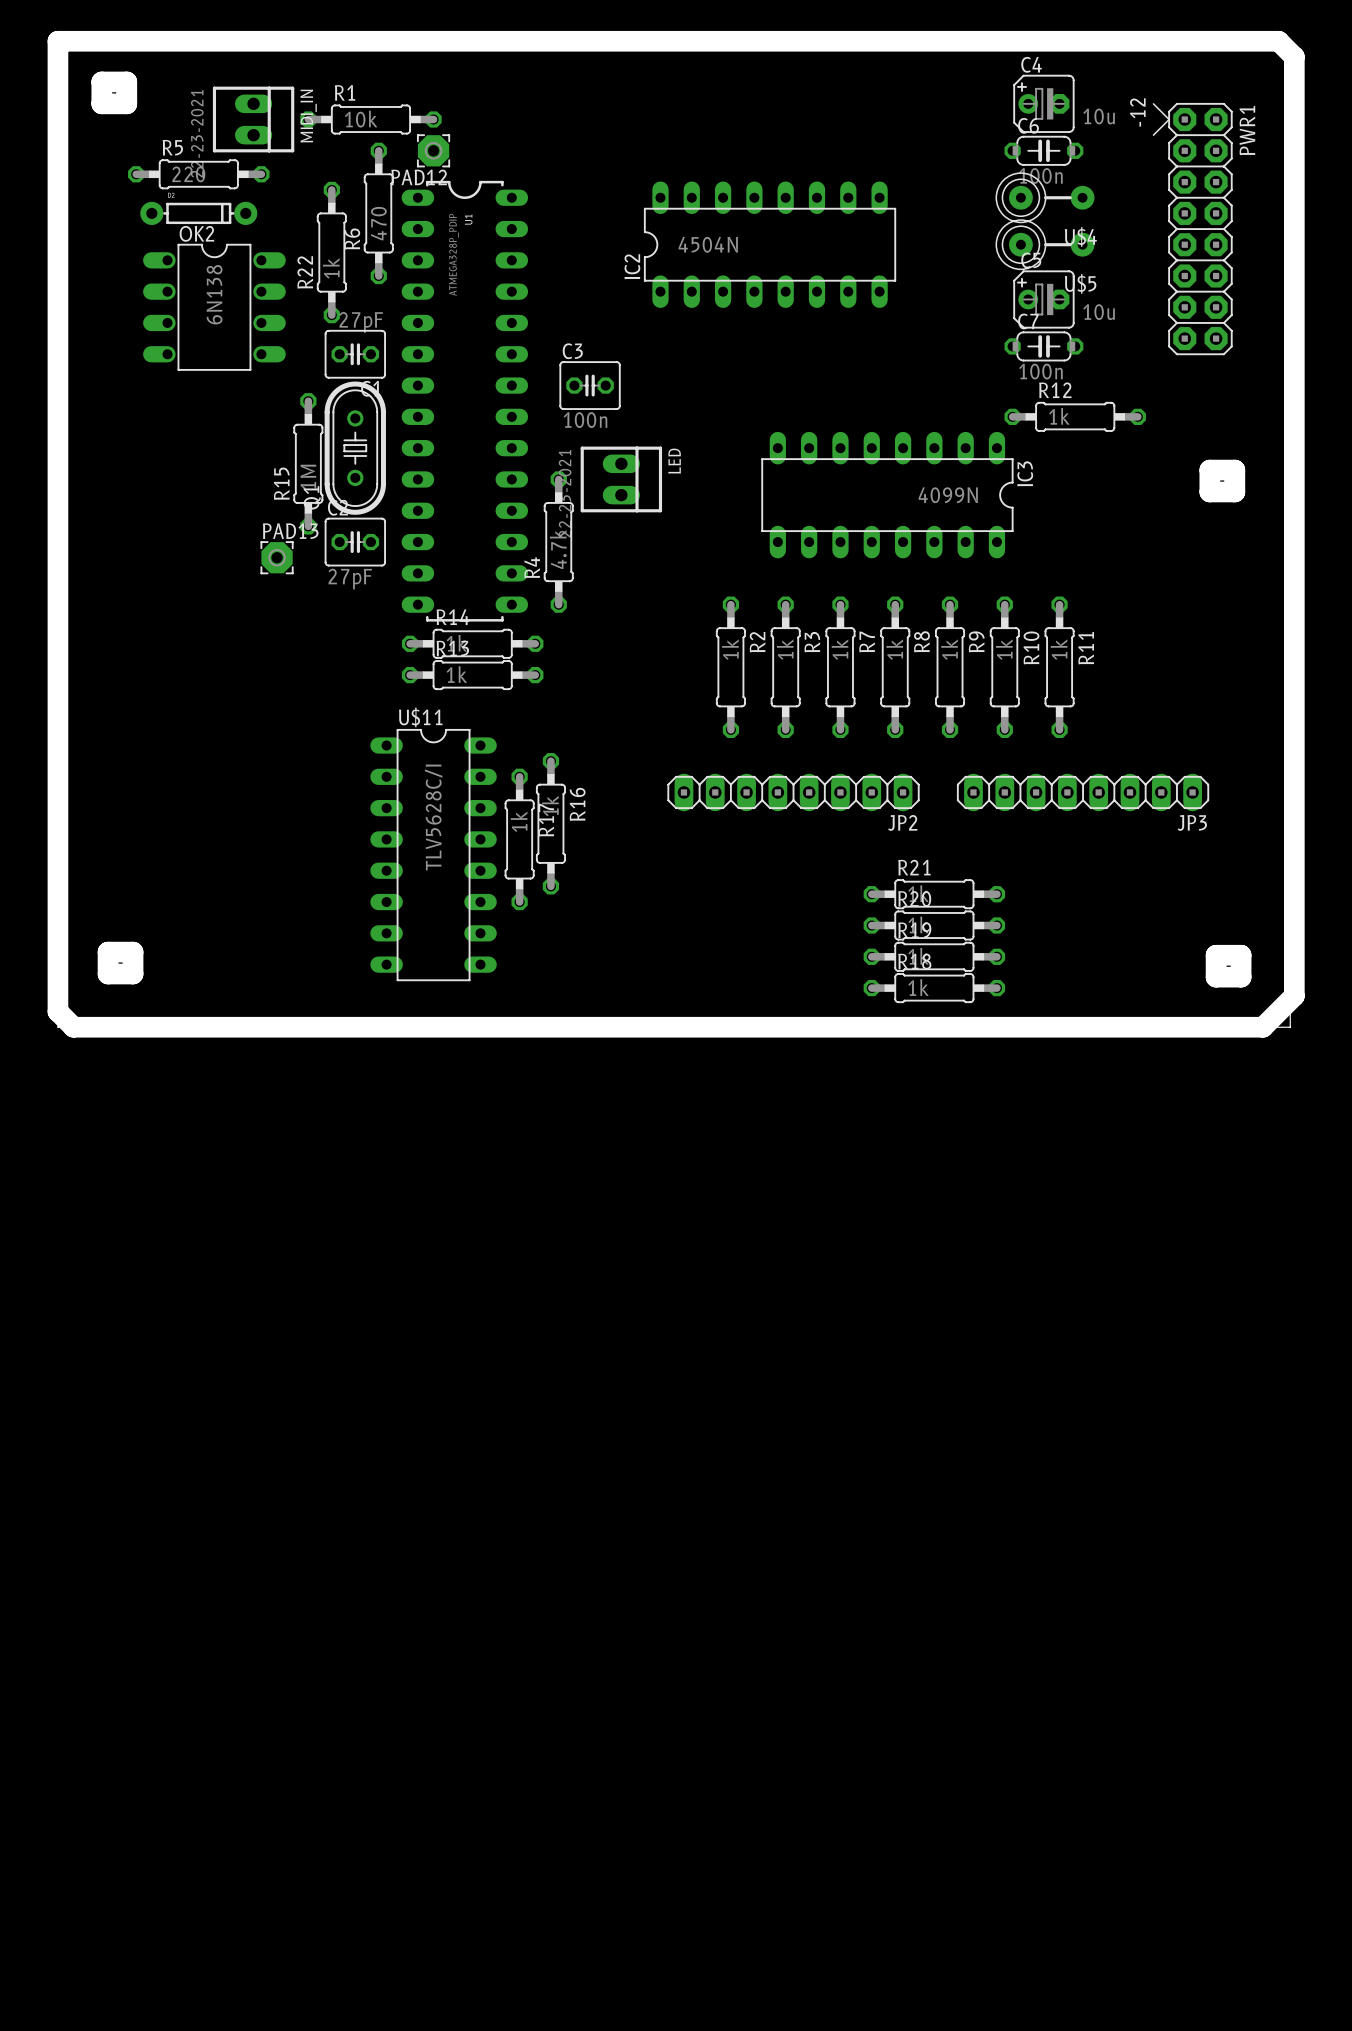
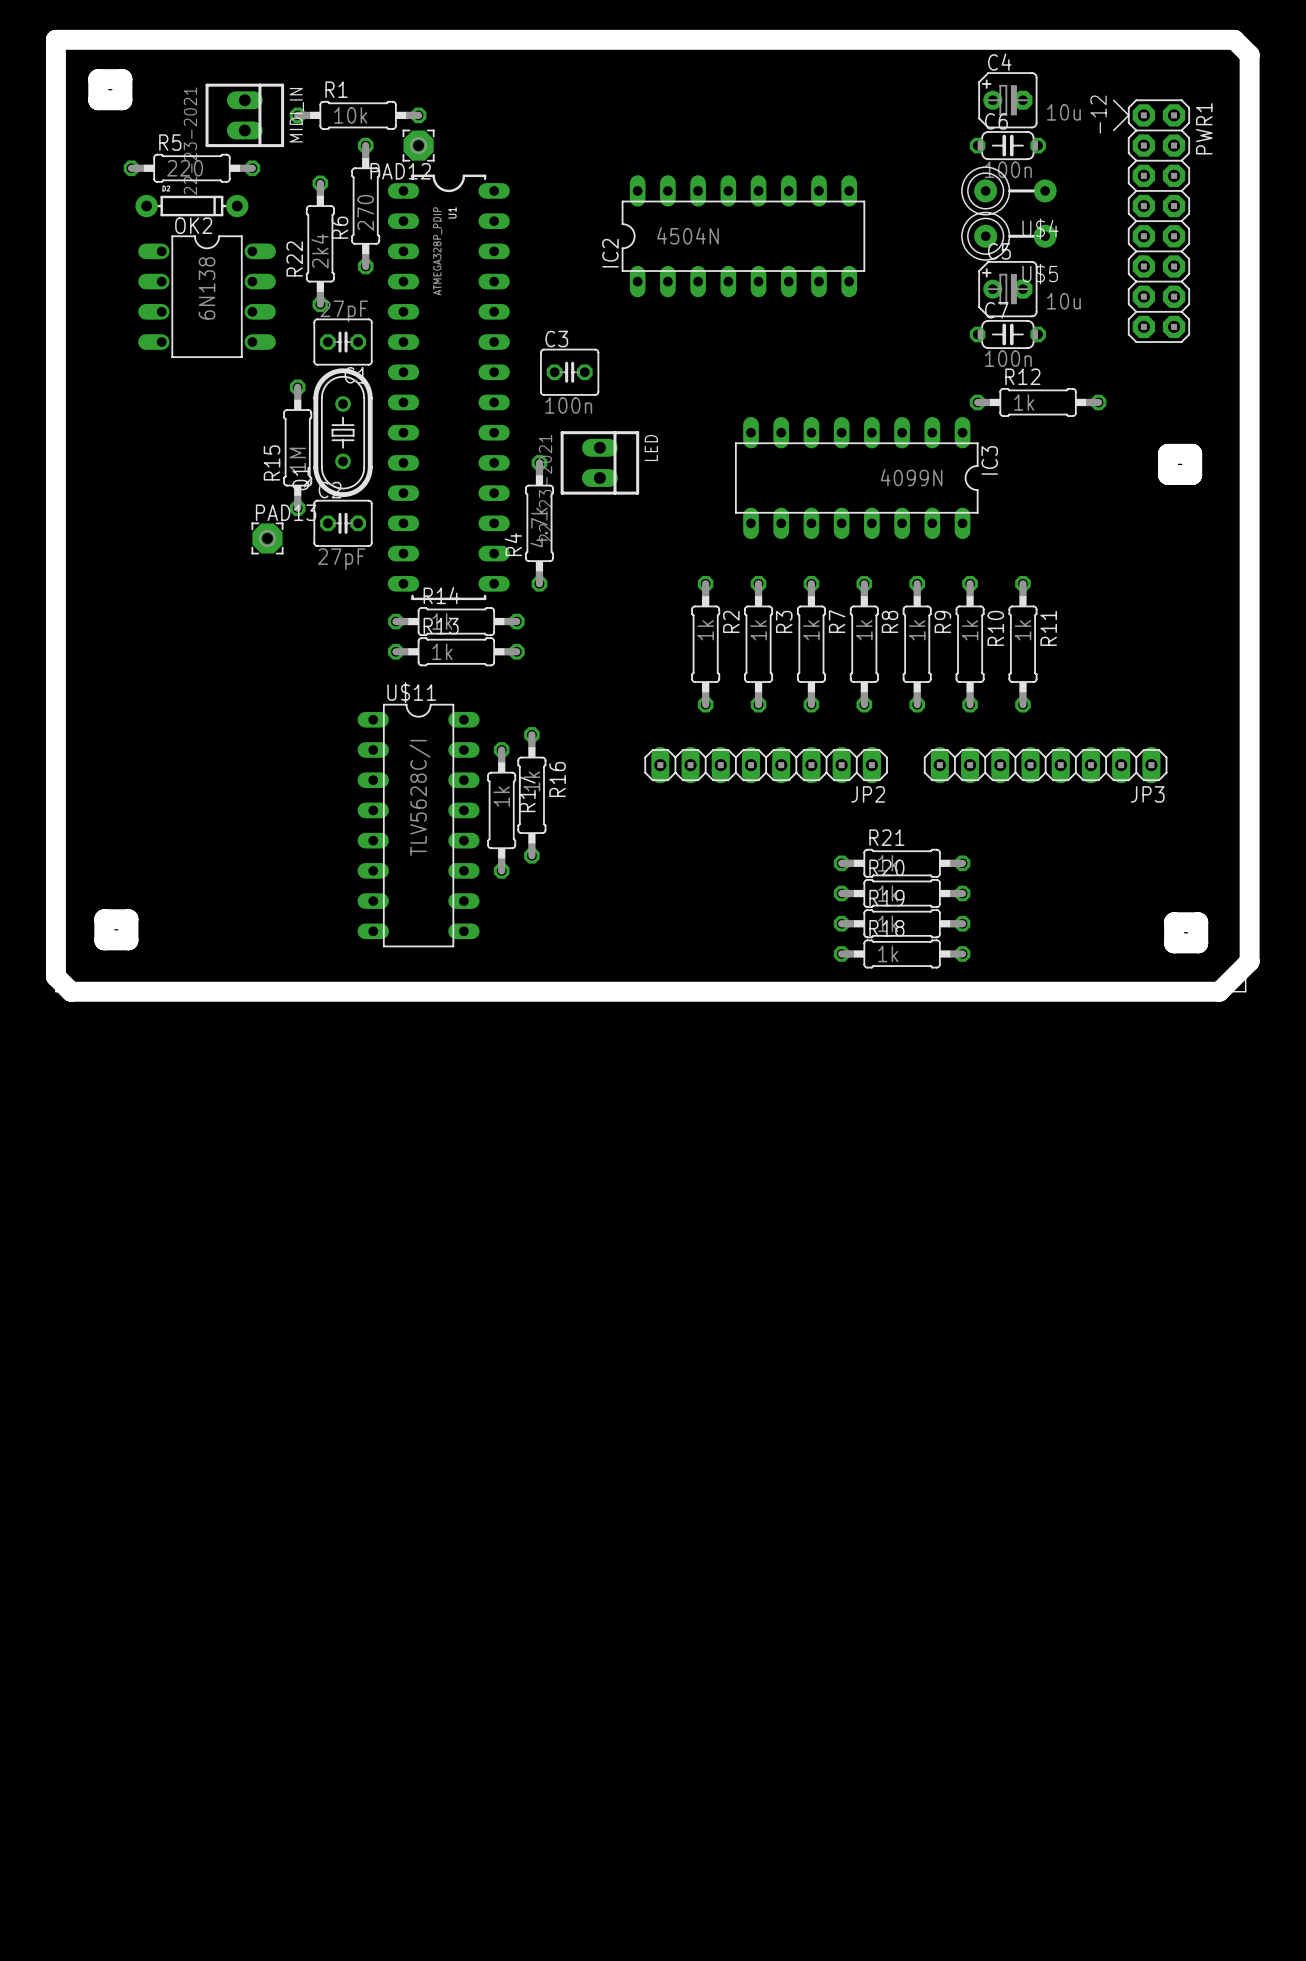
R6 value: 470 (378, 223) -> 270 (365, 212)
R22 value: 1k (331, 268) -> 2k4 (320, 251)

